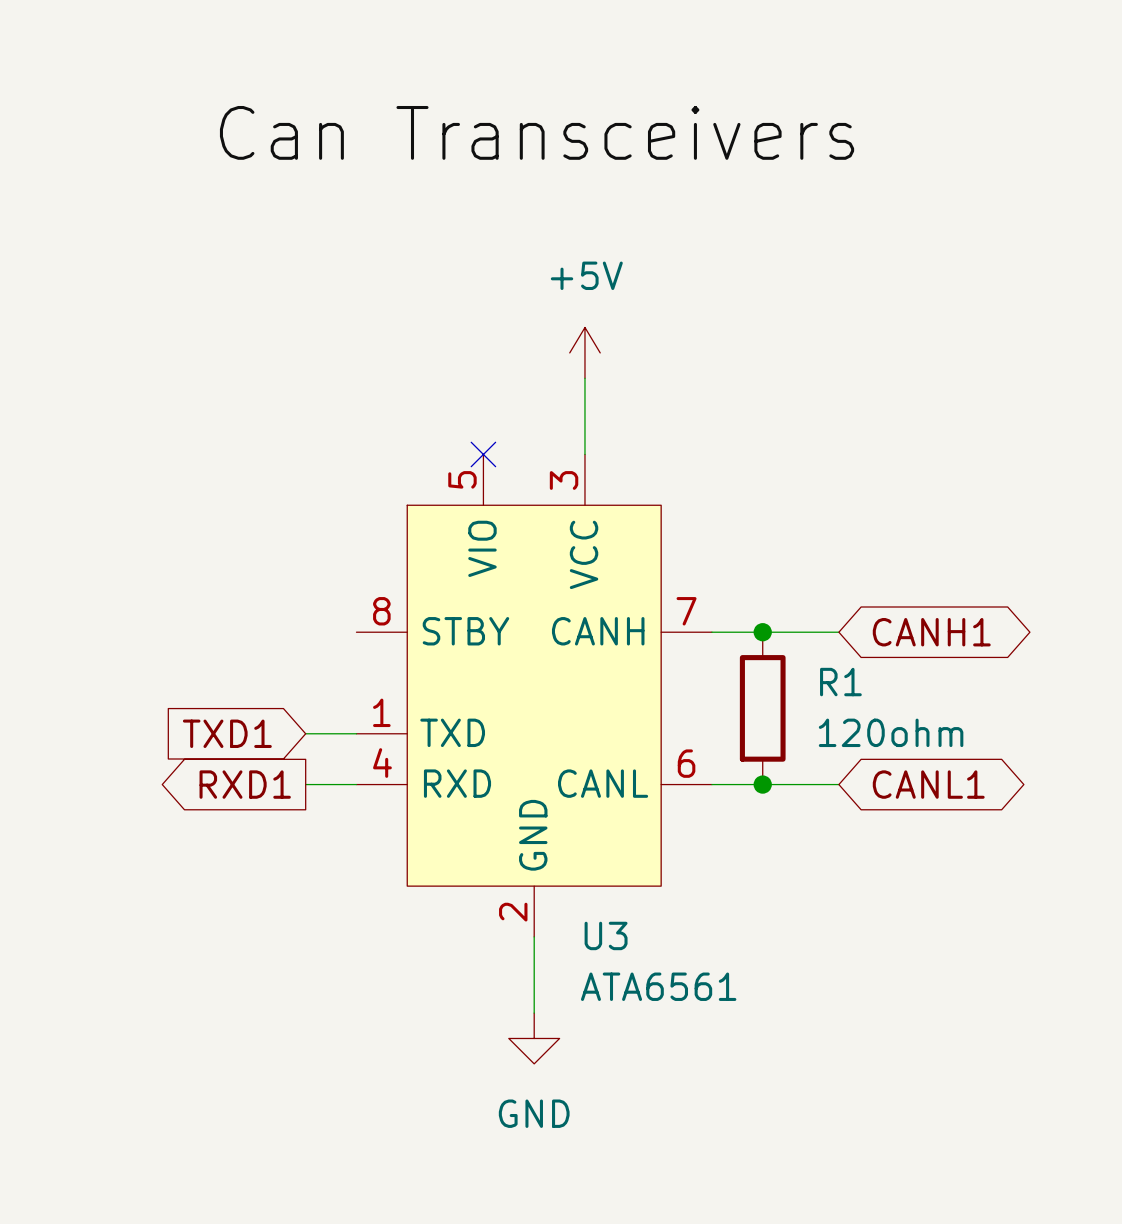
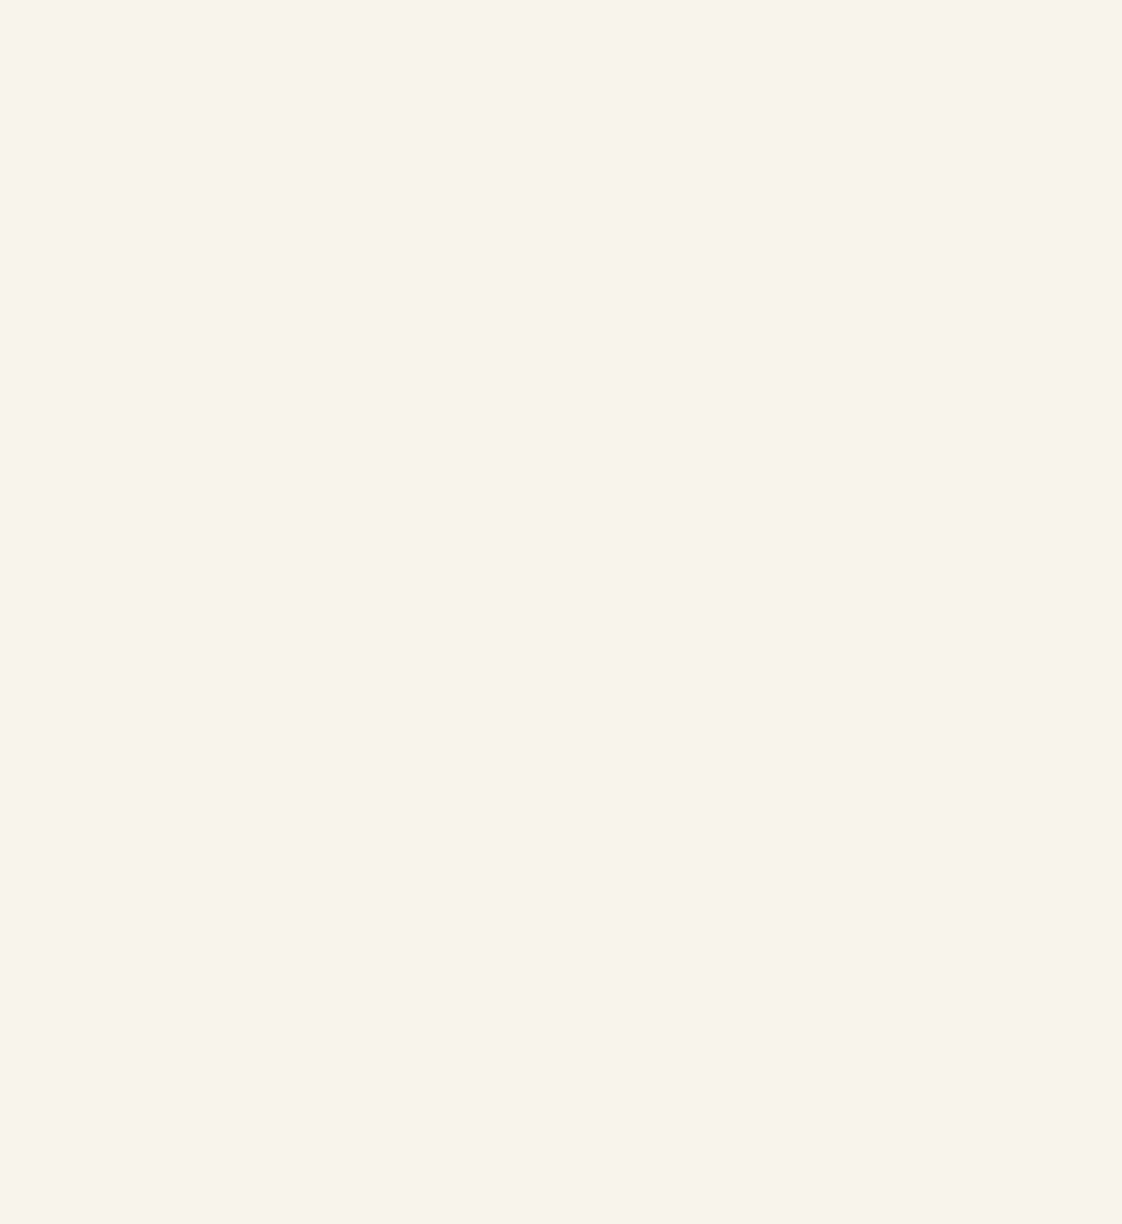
label: Can Transceivers (537, 132) -> none
power symbol: +5V (584, 352) -> none
wire: (584, 378) (584, 454) -> none
no-connect mark: (483, 454) -> none
wire: (711, 632) (838, 632) -> none
junction: (762, 632) -> none
global label: CANH1 (931, 632) -> none
U3: ATA6561 (534, 695) -> none
R1: 120ohm (762, 708) -> none
global label: TXD1 (227, 733) -> none
wire: (305, 733) (356, 733) -> none
global label: RXD1 (245, 784) -> none
wire: (305, 784) (356, 784) -> none
wire: (711, 784) (838, 784) -> none
junction: (762, 784) -> none
global label: CANL1 (928, 784) -> none
wire: (534, 936) (534, 1013) -> none
power symbol: GND (534, 1038) -> none

